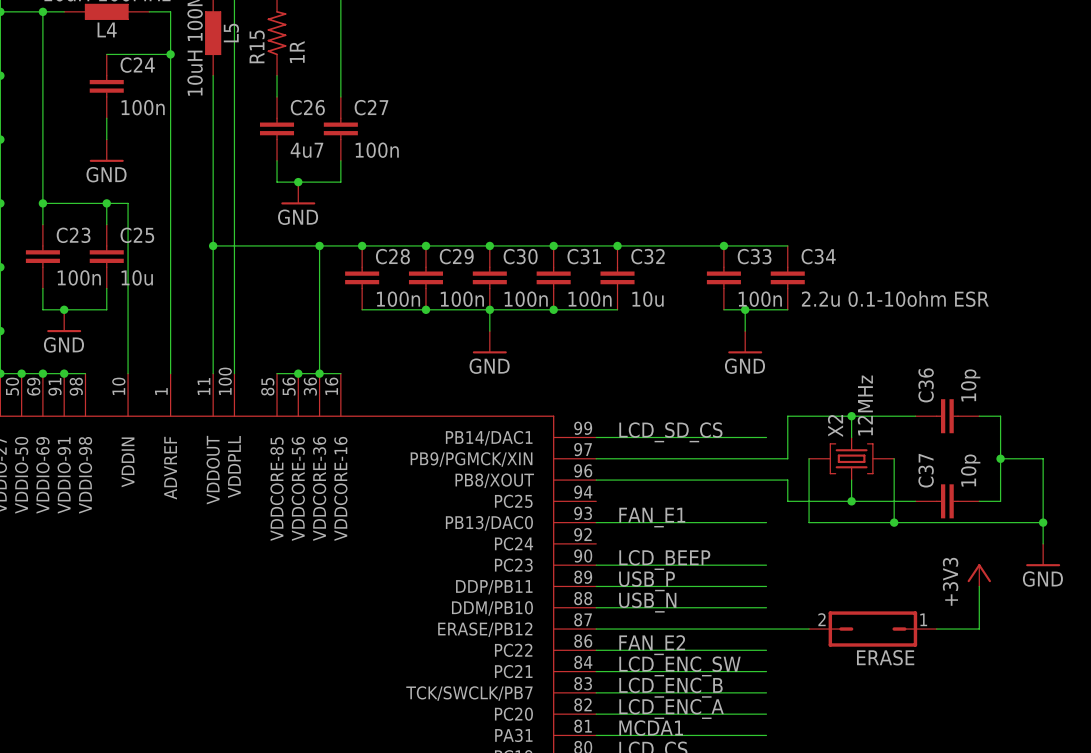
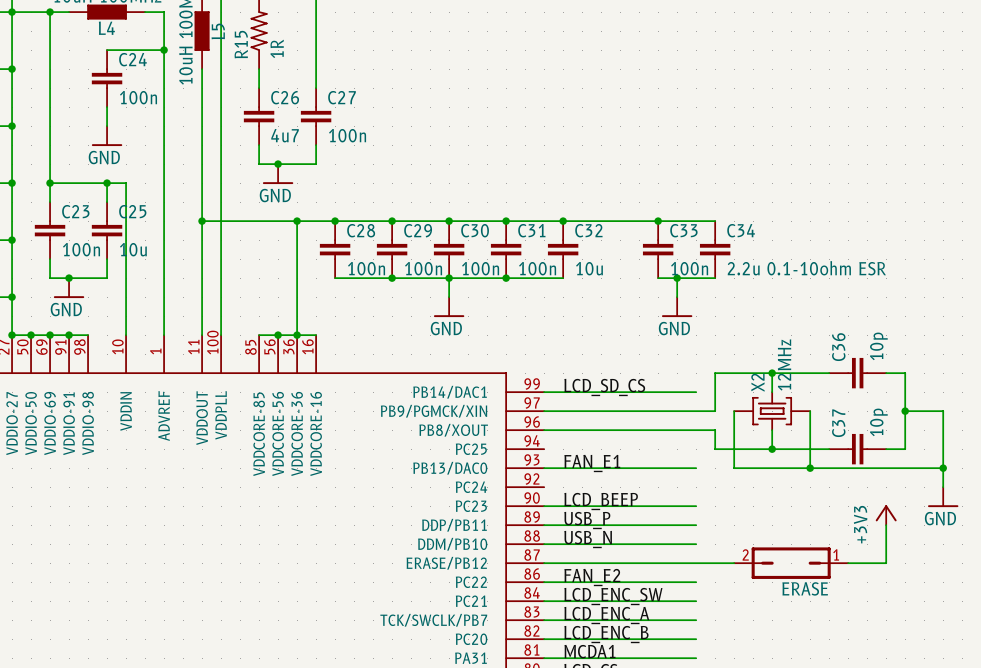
label: LCD_ENC_B (671, 687) -> LCD_ENC_A (606, 615)
label: LCD_ENC_A (671, 708) -> LCD_ENC_B (606, 634)

